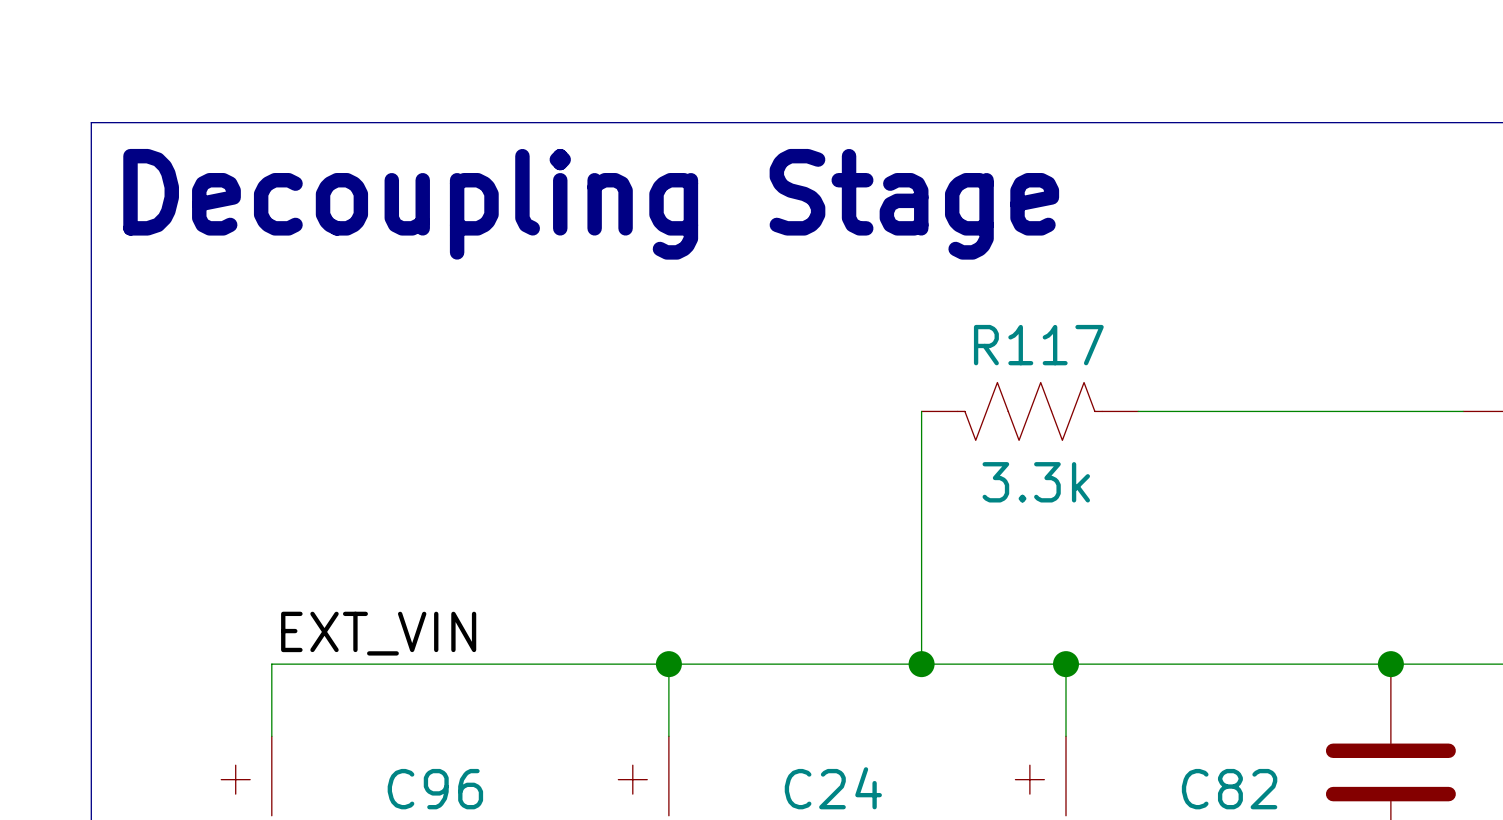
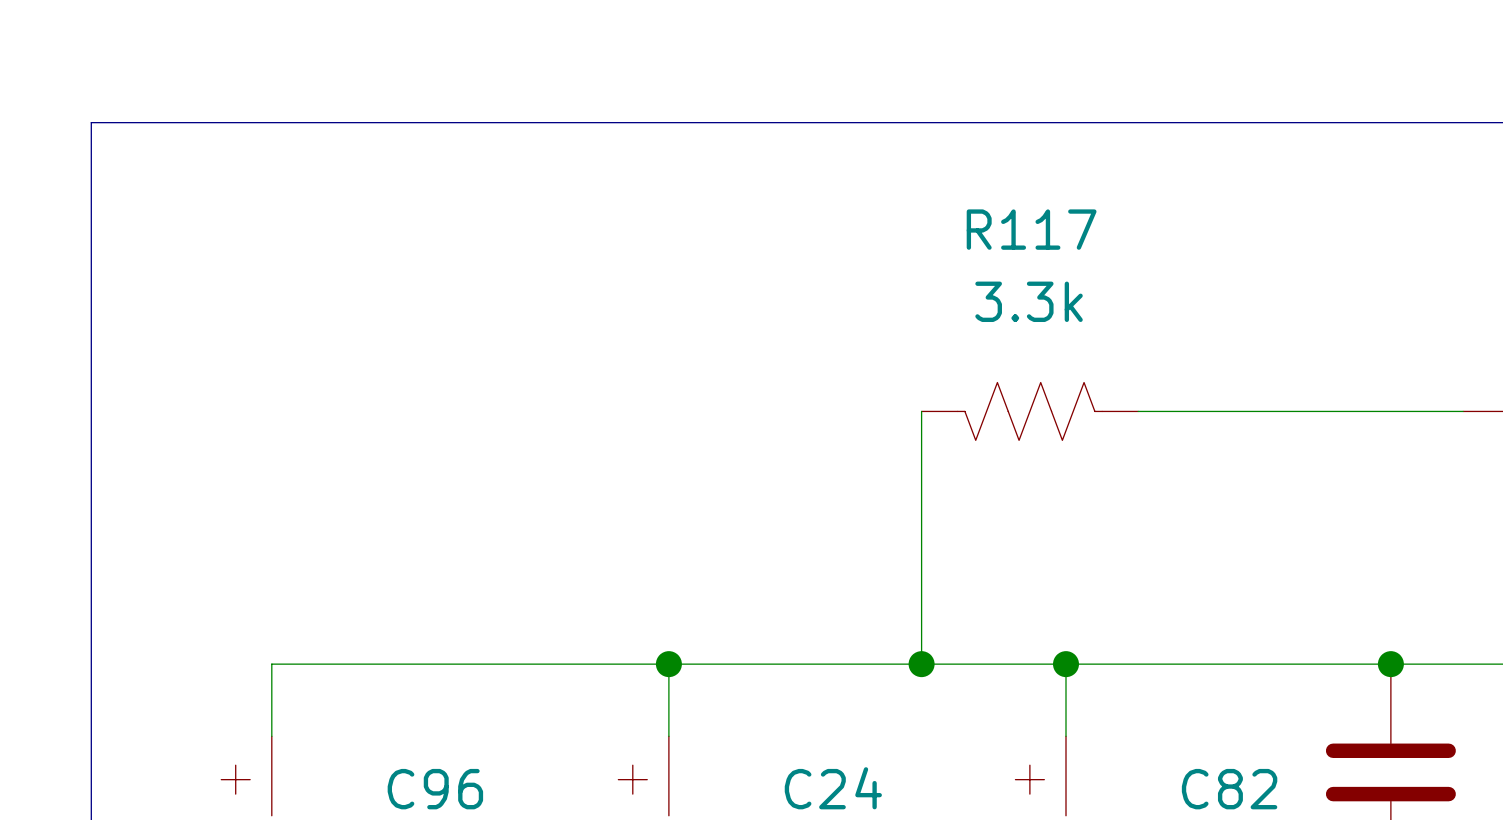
text: Decoupling Stage (591, 204) -> none
R117 name position: R117 (1038, 345) -> R117 (1031, 229)
R117 value position: 3.3k (1036, 482) -> 3.3k (1029, 301)
label: EXT_VIN (378, 633) -> none

